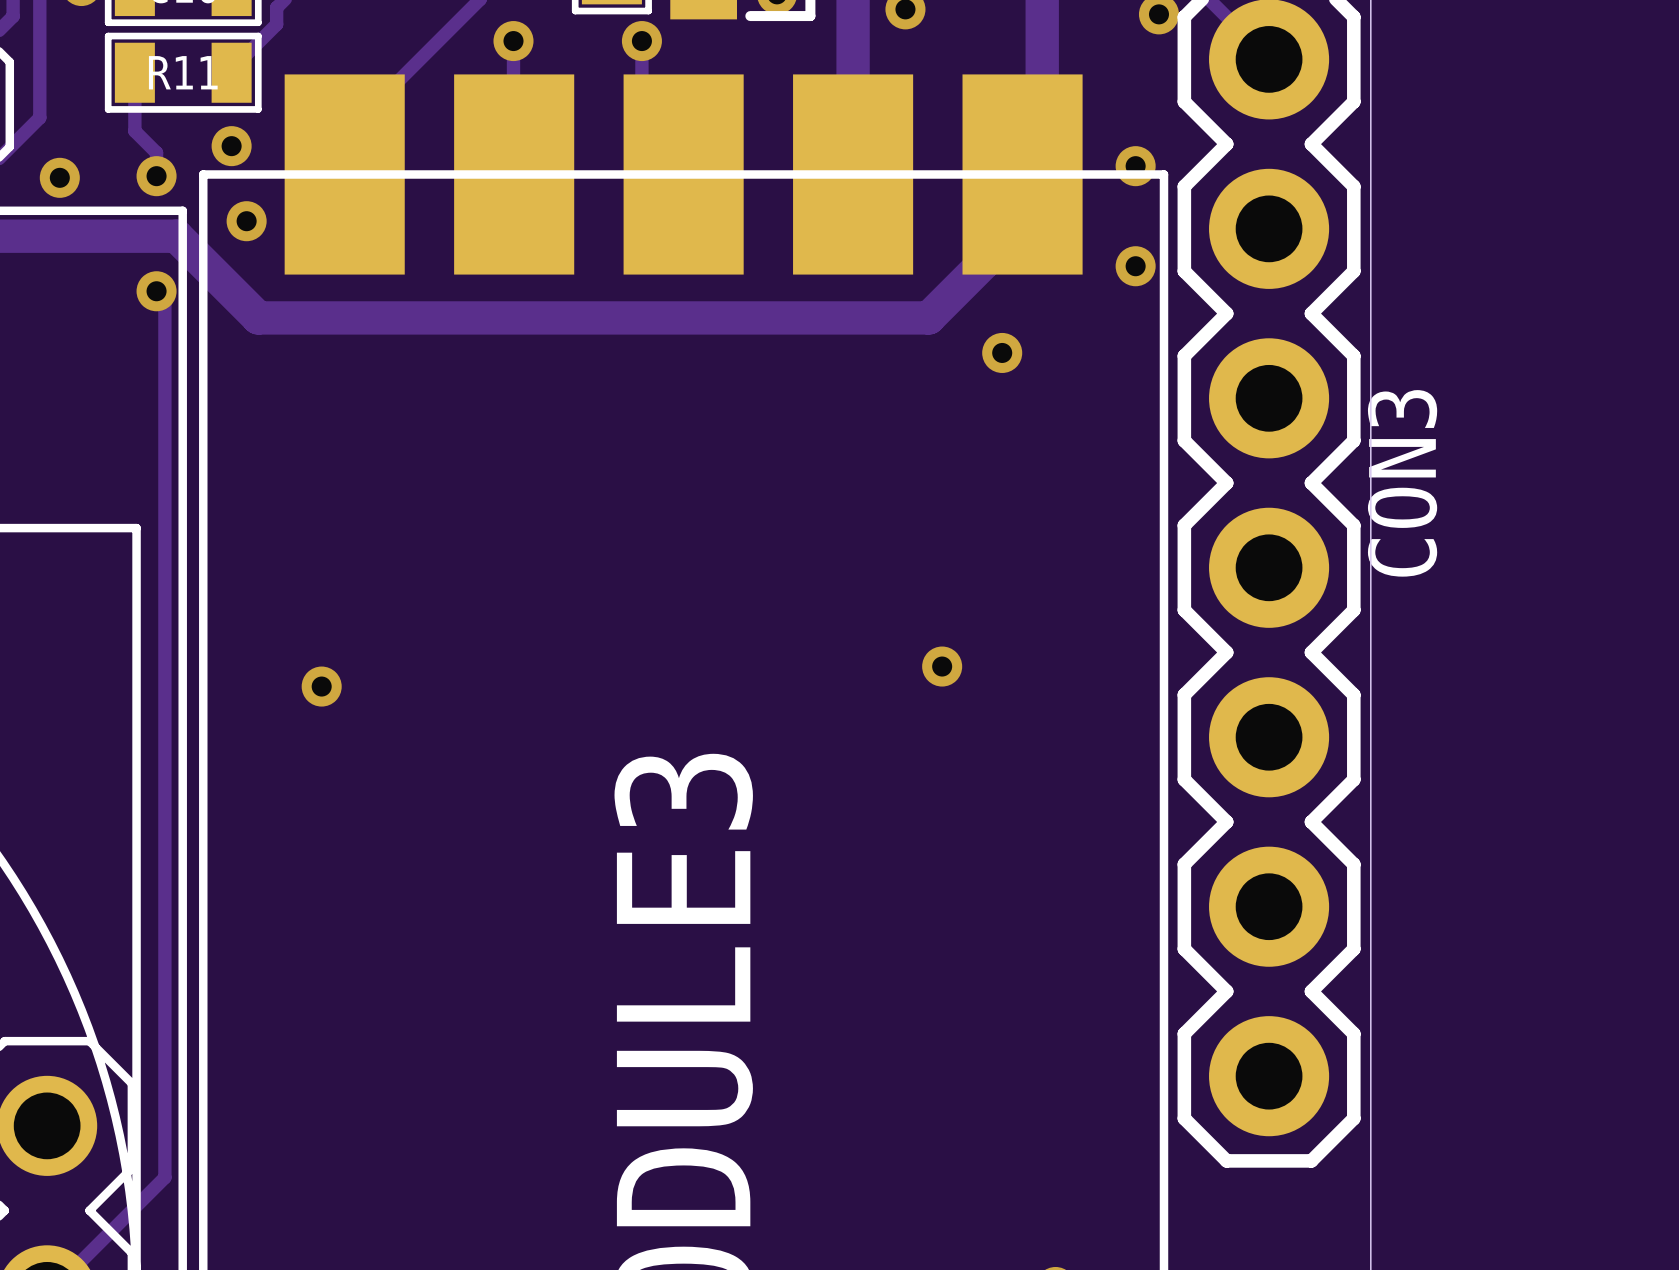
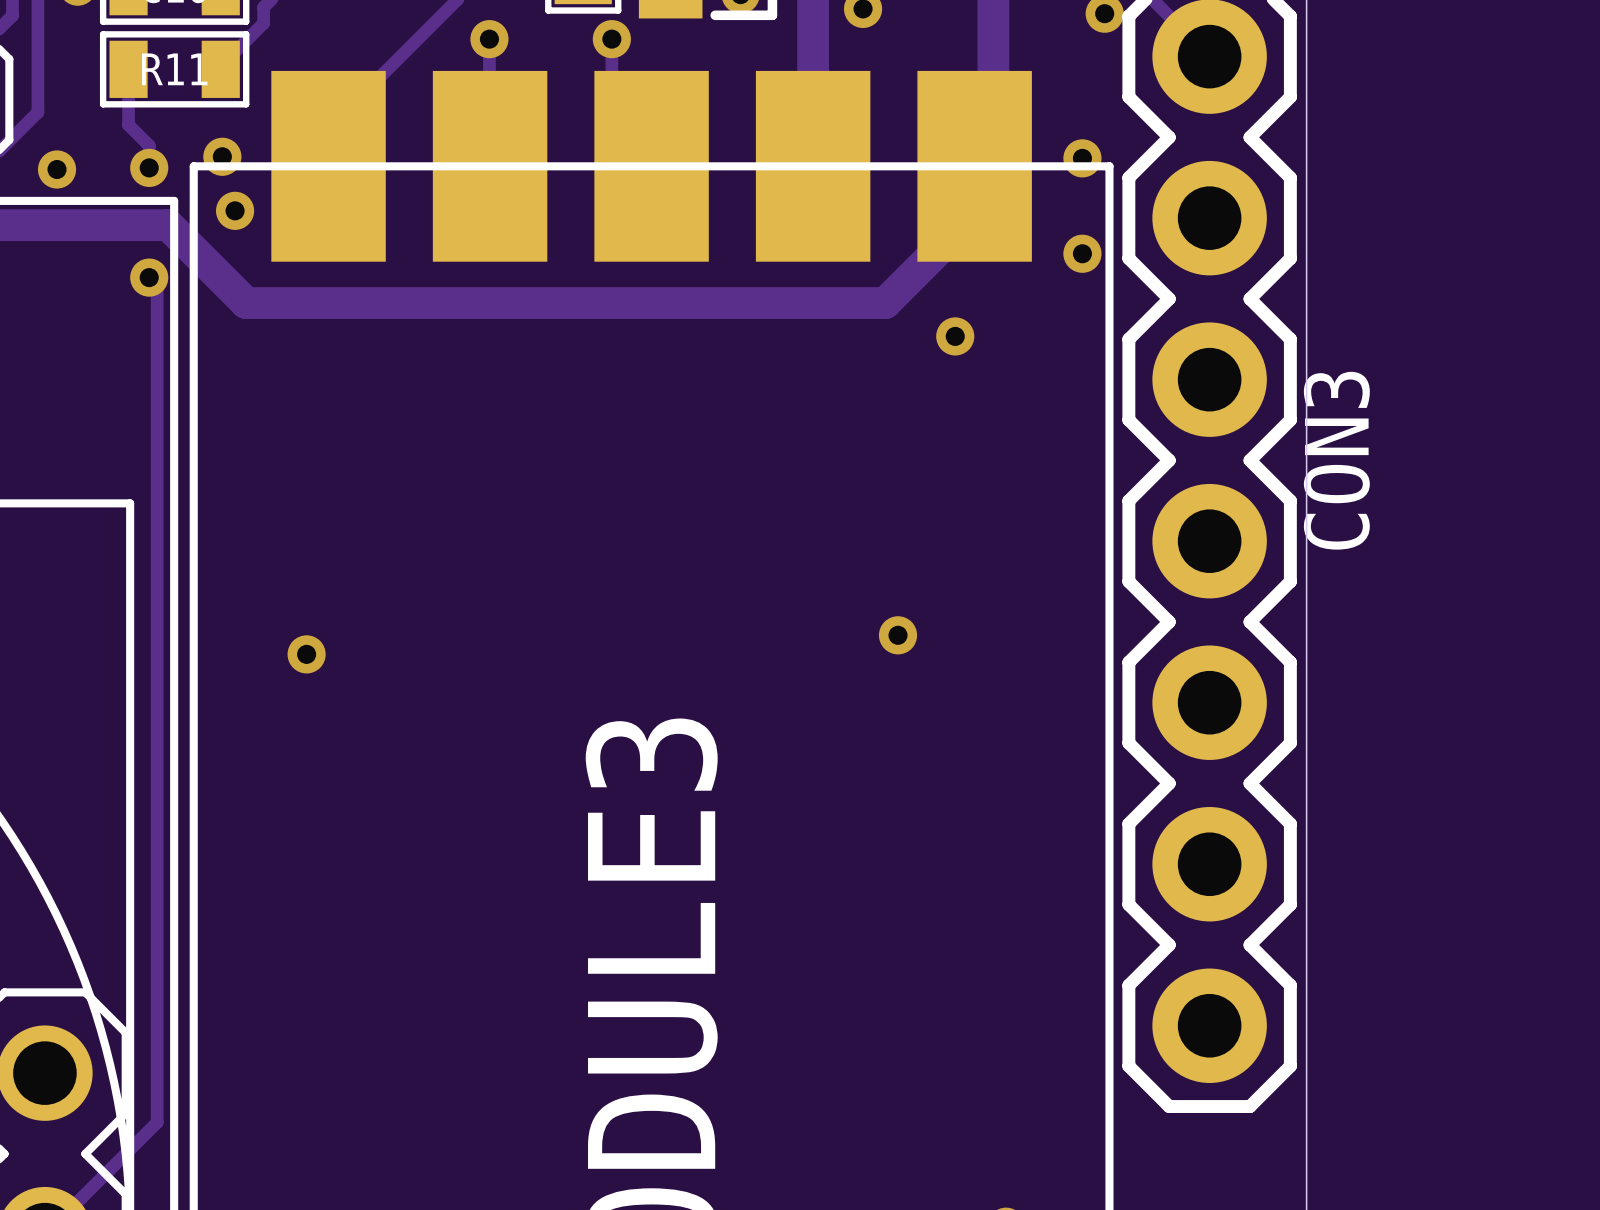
via position: (231, 146) -> (222, 156)

